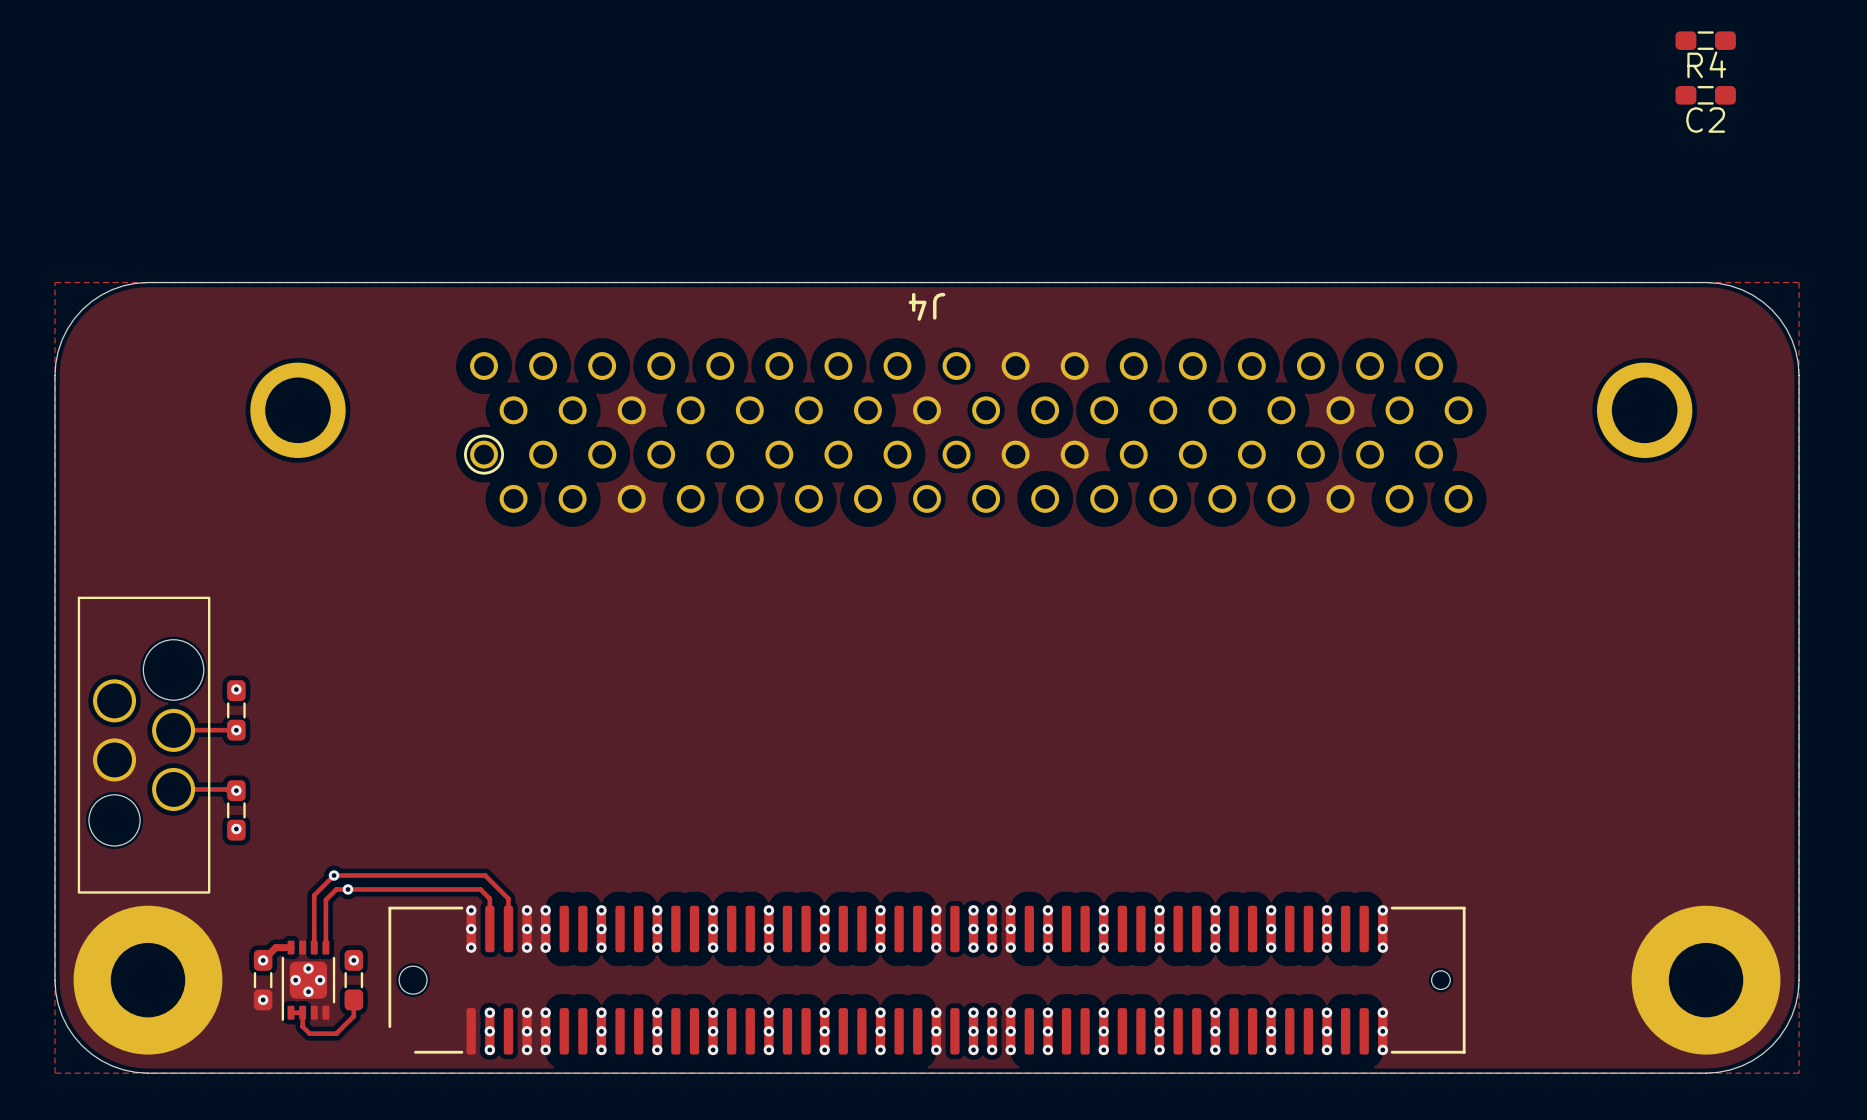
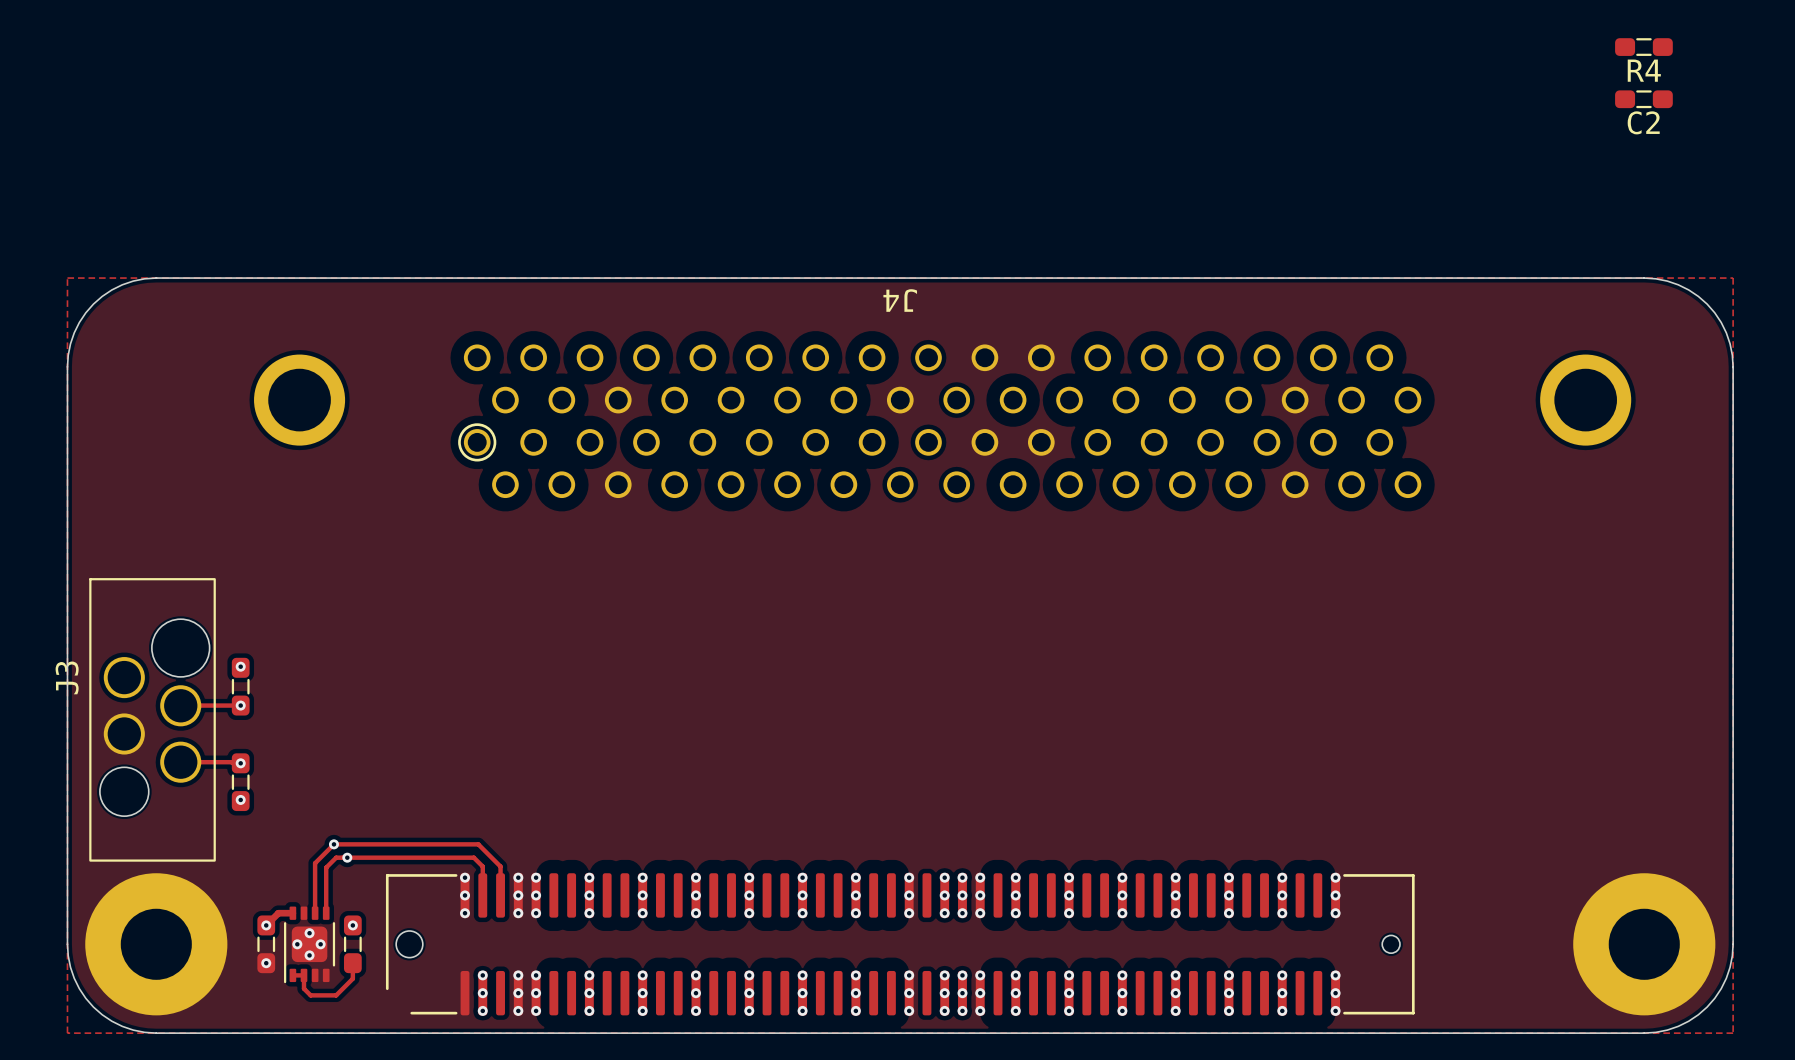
J3 name: none -> J3 (67, 677)

